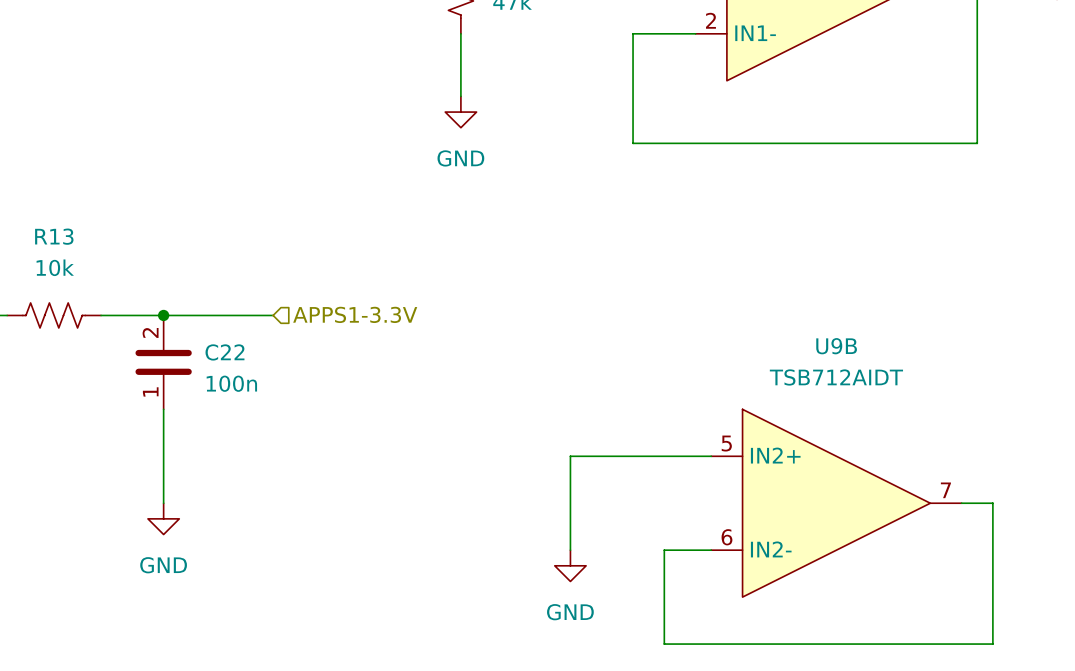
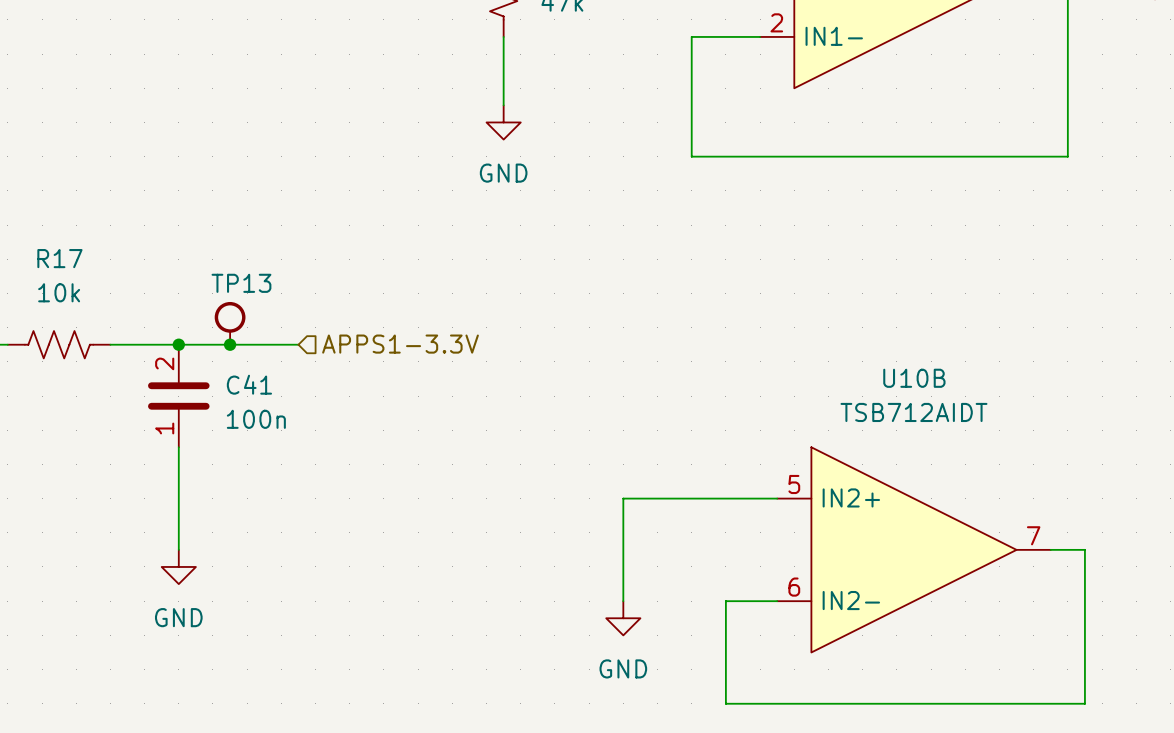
R13 name: R13 (54, 236) -> R17 (59, 258)
TP13: none -> (230, 323)
junction: none -> (230, 344)
U9B name: U9B (836, 346) -> U10B (914, 378)
C22 name: C22 (224, 352) -> C41 (249, 384)

